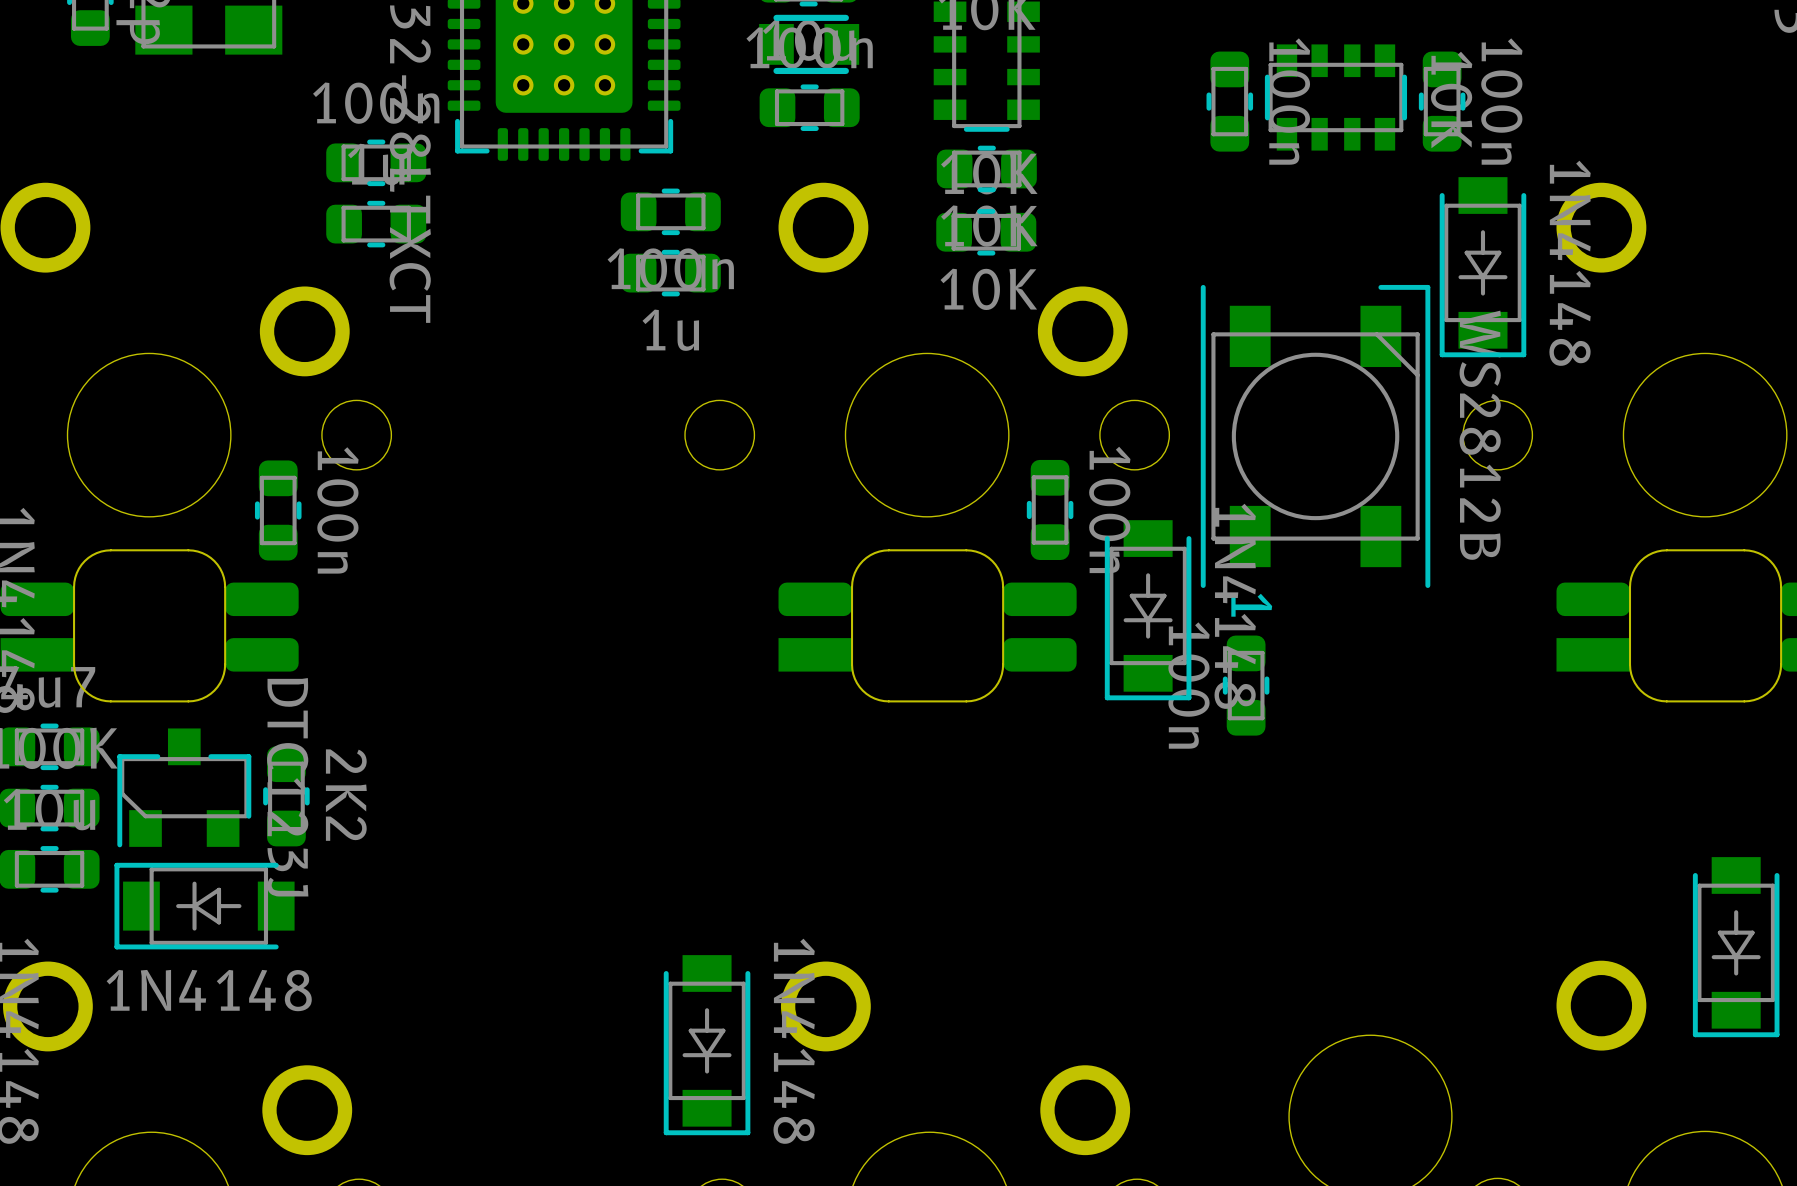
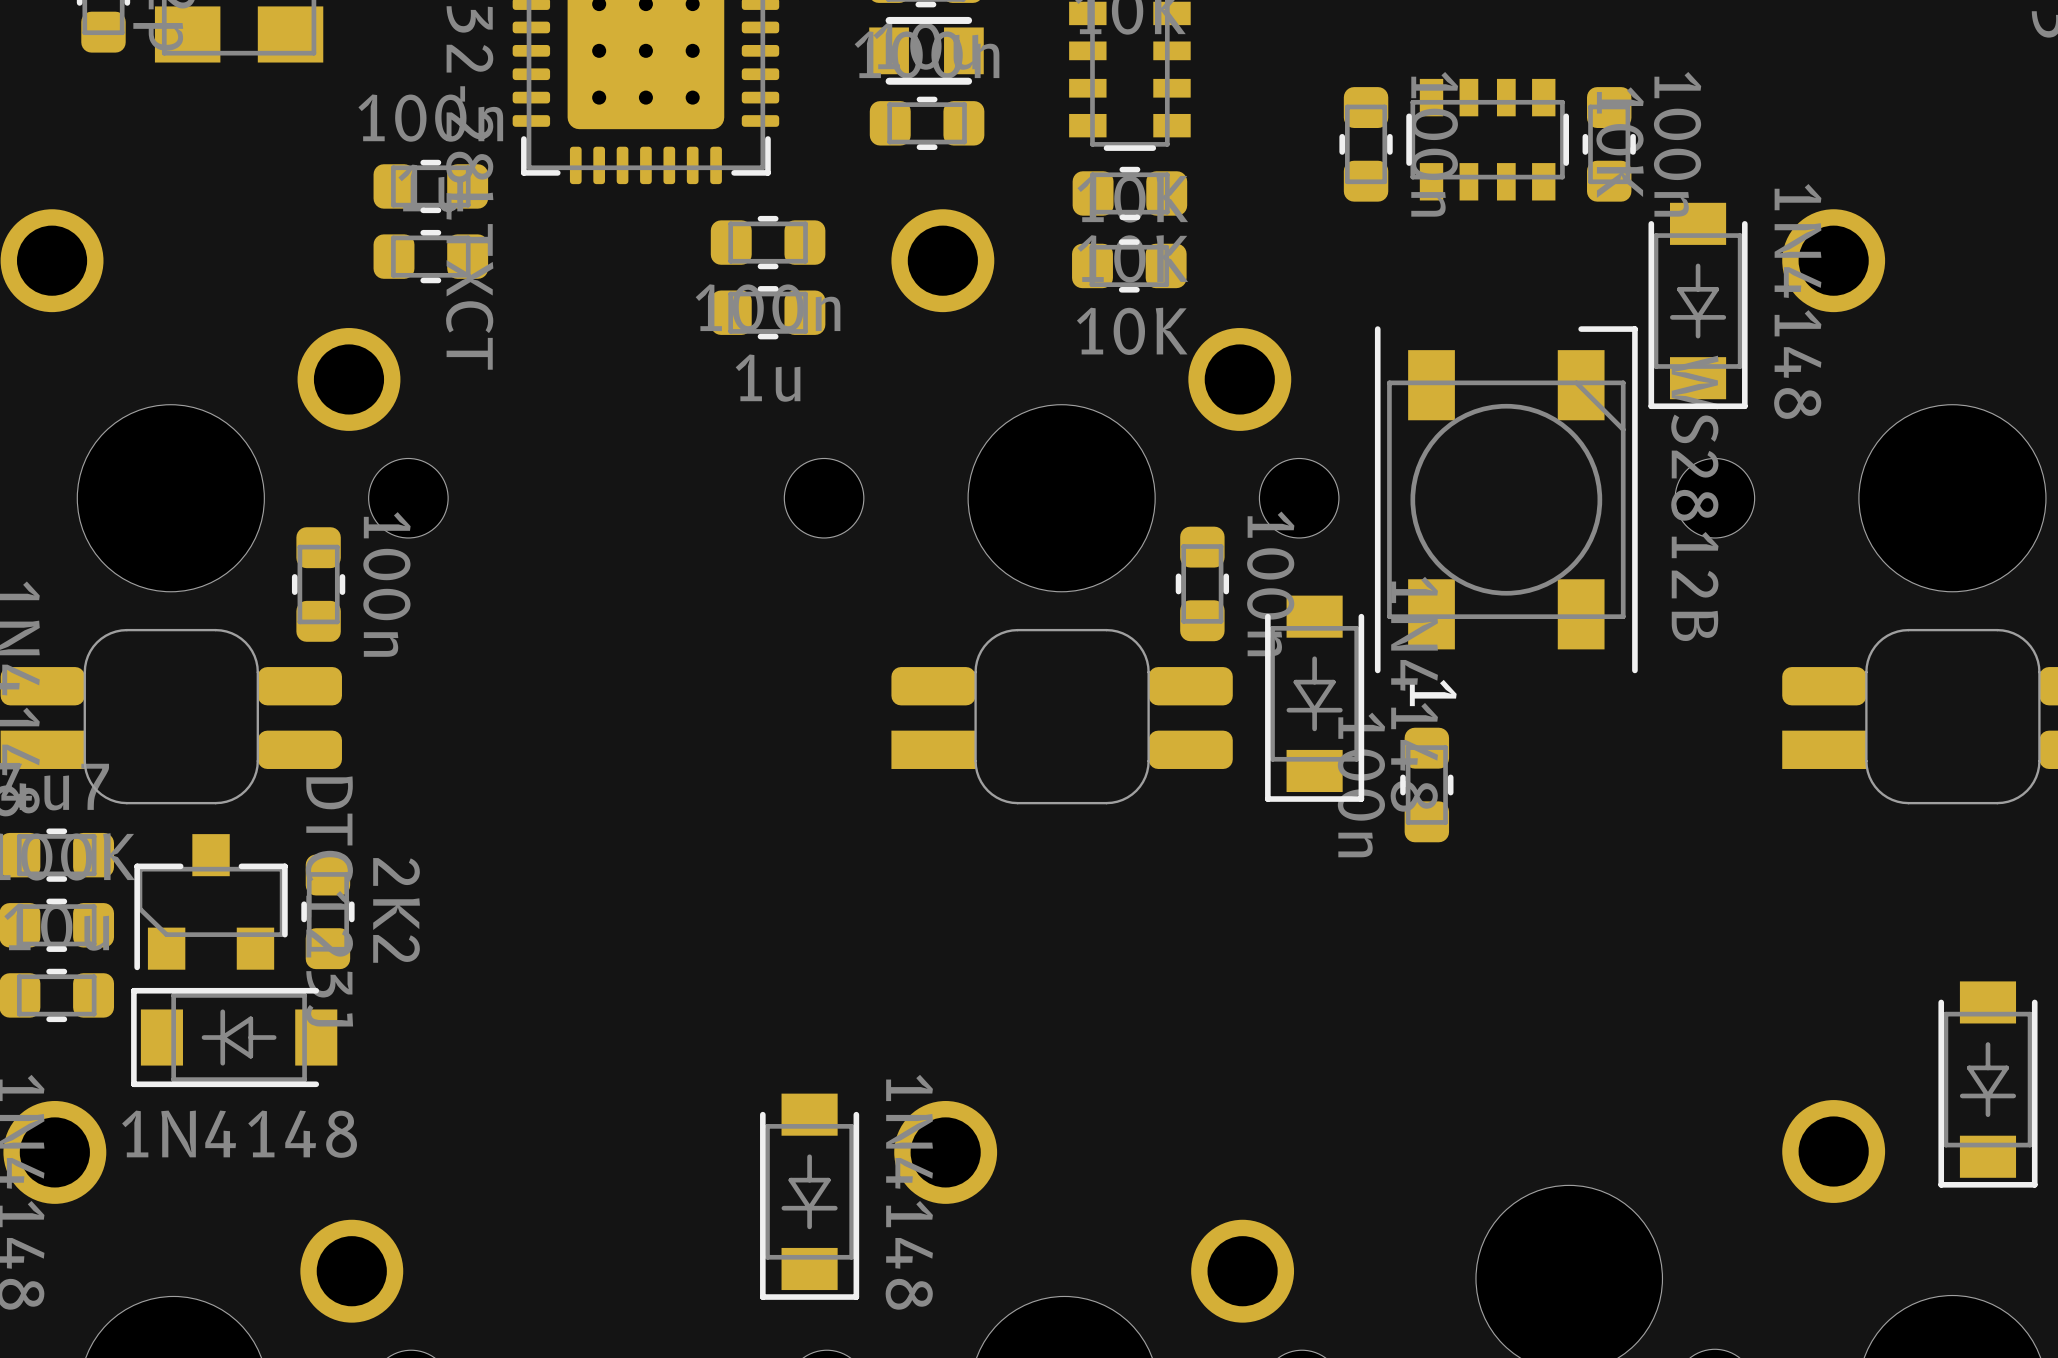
part position: (1335, 97) -> (1487, 139)
part position: (1229, 101) -> (1366, 144)
part position: (1442, 101) -> (1609, 144)

